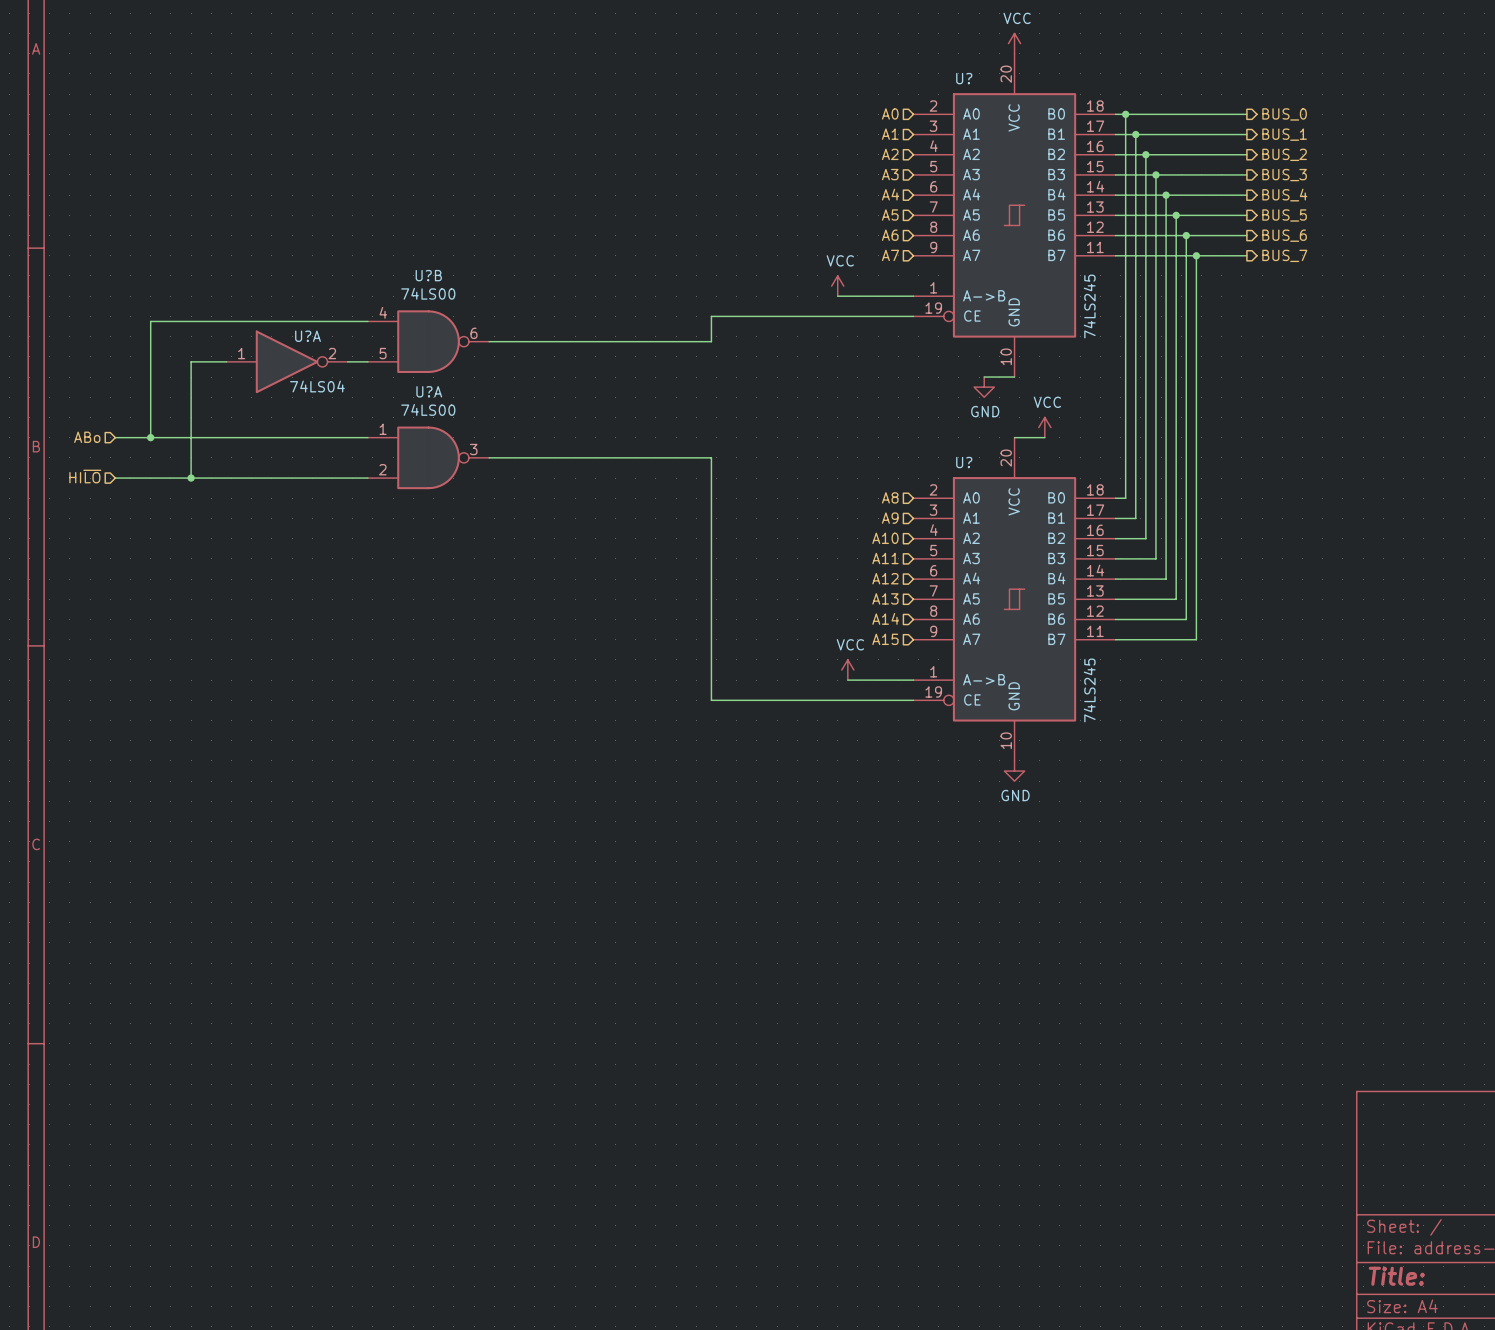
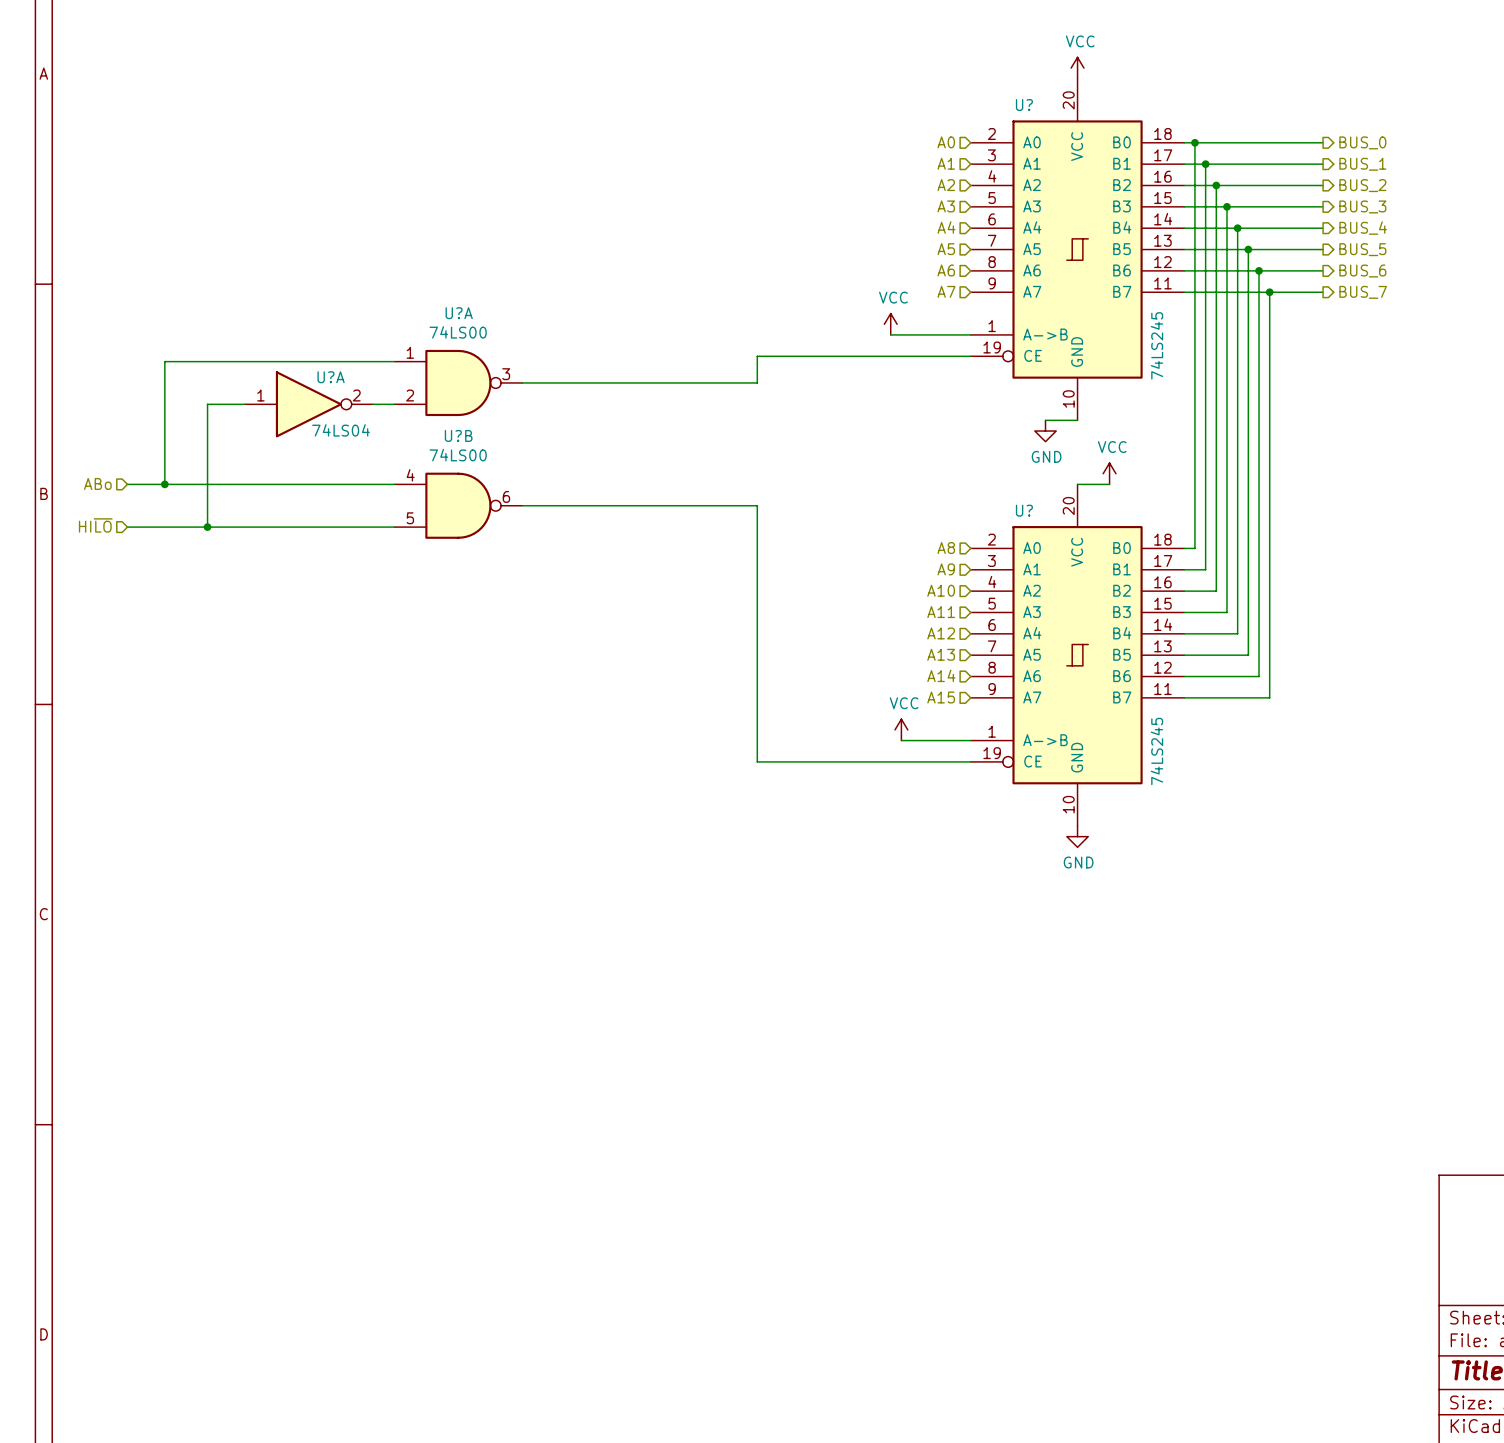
U?B name: U?B (428, 275) -> U?A (459, 313)
U?B pin number: 4 (383, 312) -> 1 (410, 352)
U?B pin number: 6 (474, 333) -> 3 (506, 374)
U?B pin number: 5 (383, 353) -> 2 (410, 395)
U?A name: U?A (429, 391) -> U?B (458, 435)
U?A pin number: 1 (383, 429) -> 4 (410, 475)
U?A pin number: 3 (473, 449) -> 6 (506, 496)
U?A pin number: 2 (382, 469) -> 5 (410, 518)

